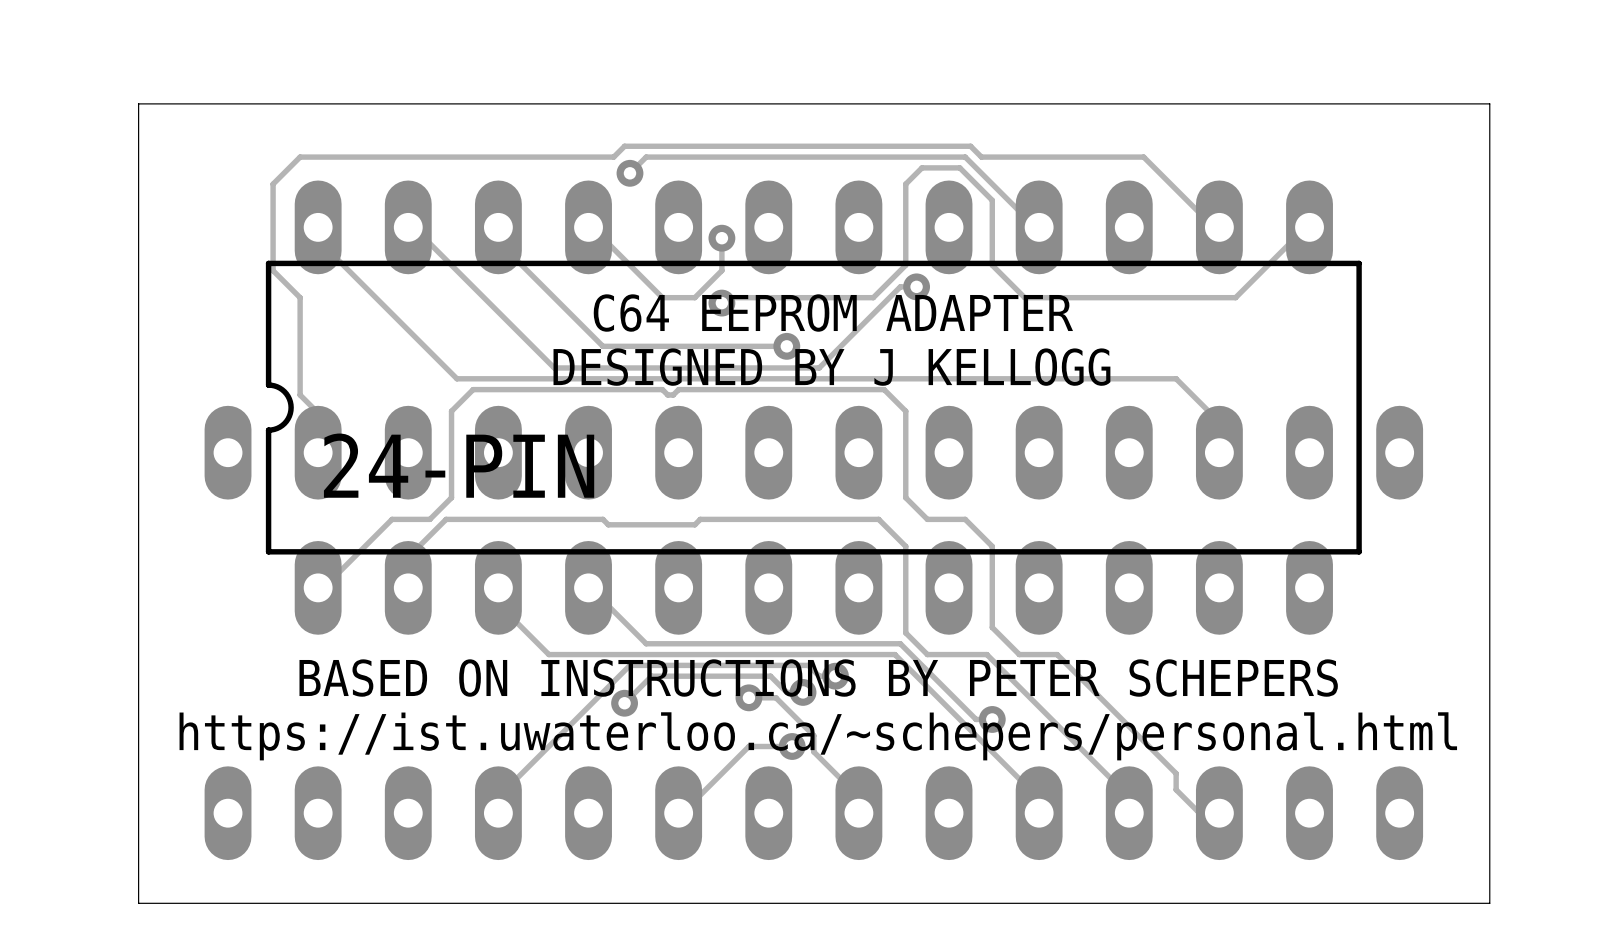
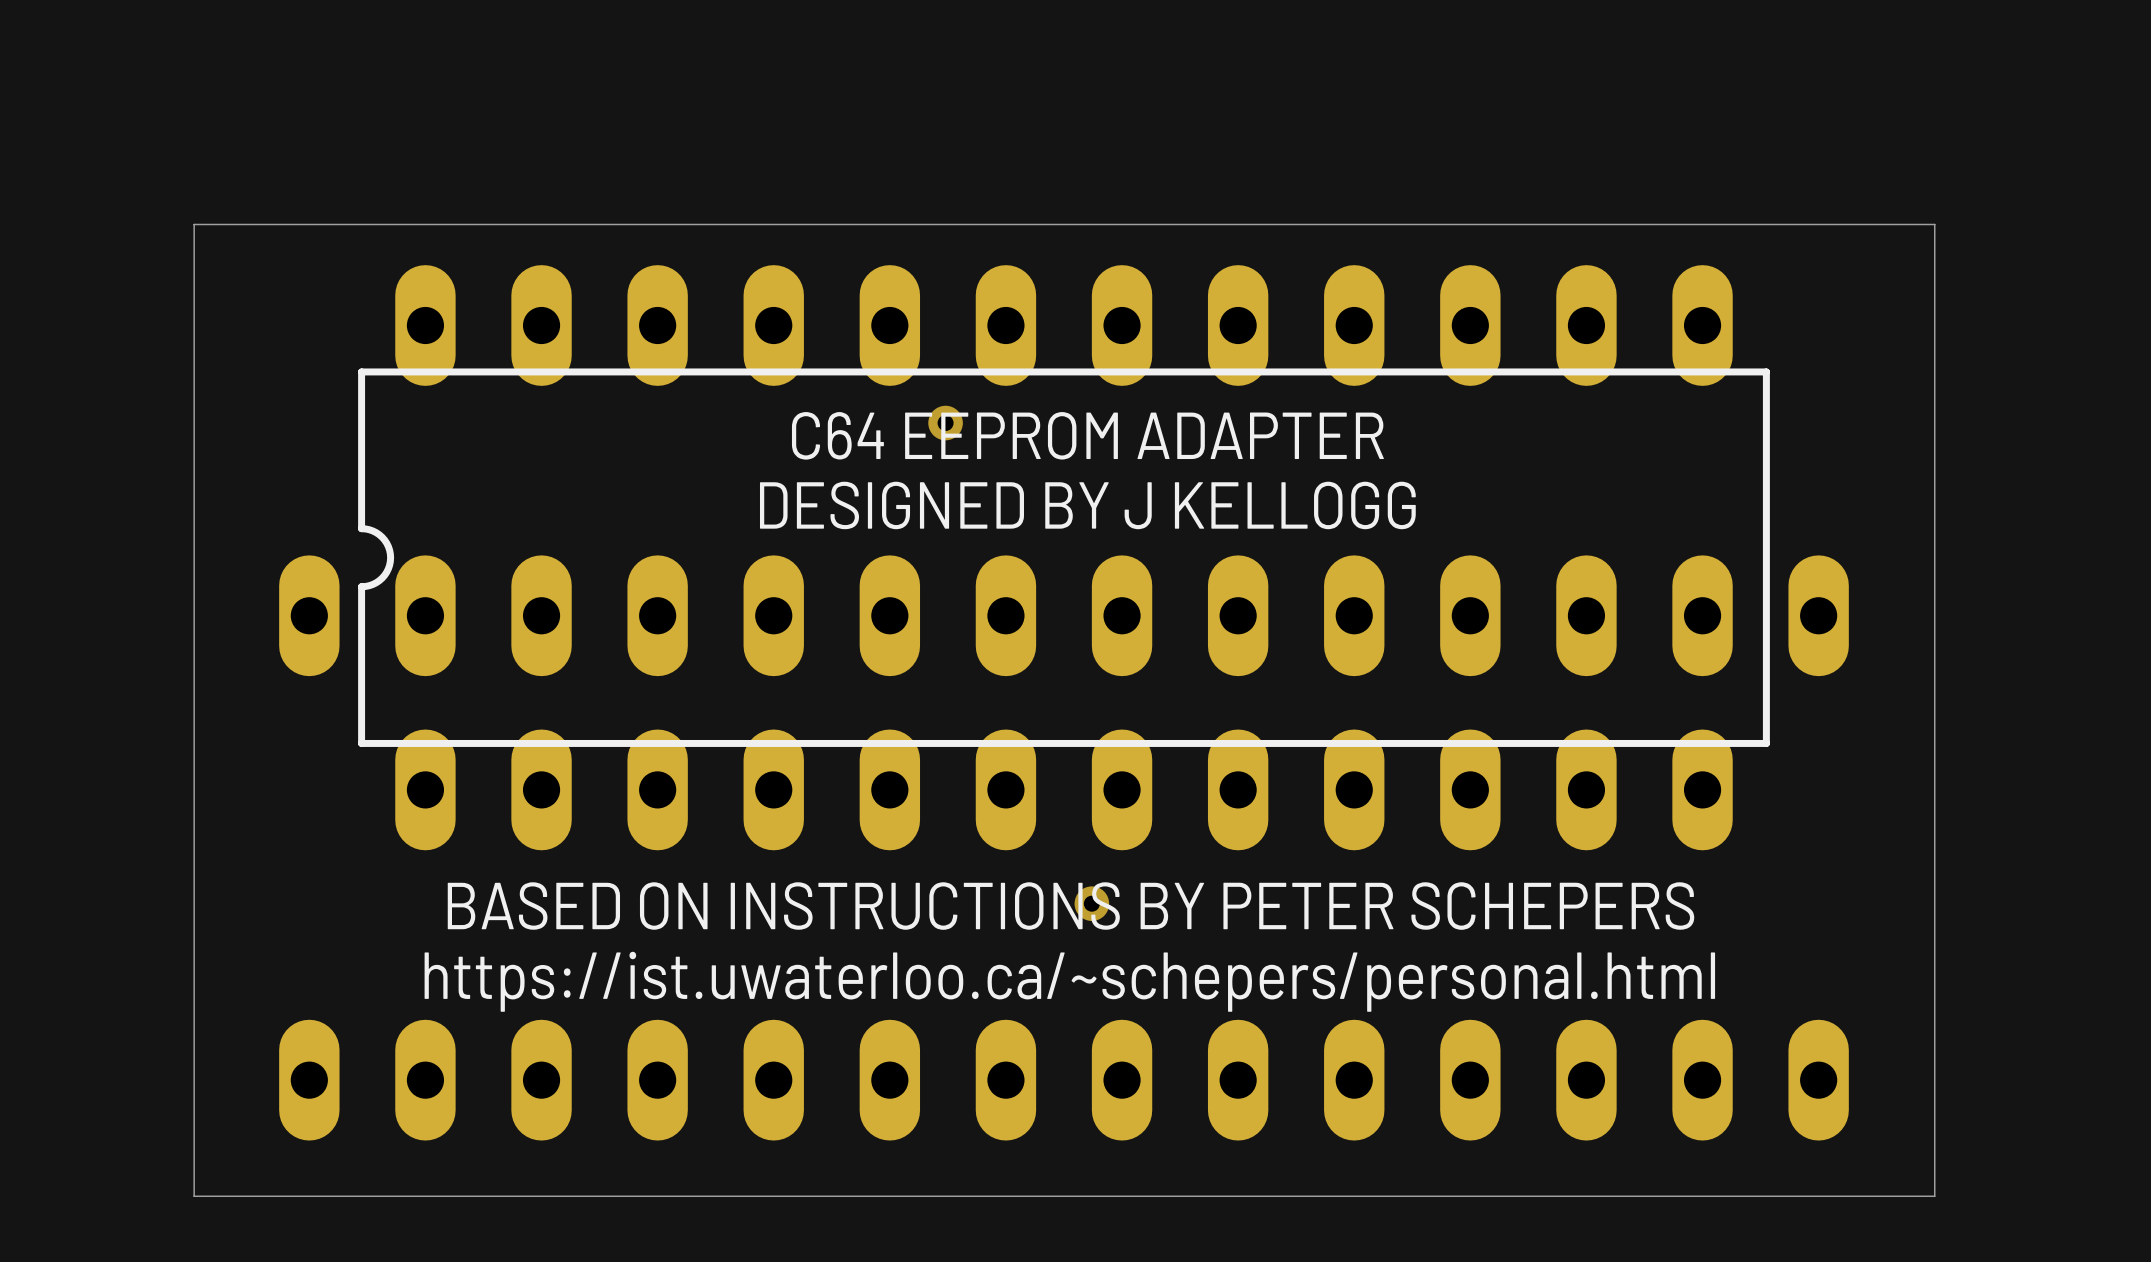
board edge: (1489, 148) (1489, 103) (138, 103) (138, 148) -> (1934, 224) (194, 224)
track: (629, 173) (646, 157) (965, 157) (1035, 227) (1039, 227) -> none
via: (629, 173) -> none
track: (318, 227) (321, 227) (321, 243) (456, 378) (1176, 378) (1219, 422) (1219, 452) -> none
track: (408, 227) (413, 227) (554, 367) (819, 367) (900, 286) (916, 286) -> none
track: (498, 227) (500, 227) (500, 243) (602, 346) (786, 346) -> none
track: (588, 227) (592, 227) (662, 297) (694, 297) (721, 270) (721, 238) -> none
track: (1219, 227) (1213, 227) (1143, 157) (981, 157) (970, 146) (624, 146) (613, 157) (300, 157) (273, 184) (273, 270) (300, 297) (300, 395) (316, 411) (316, 449) (318, 452) -> none
track: (1309, 227) (1305, 227) (1235, 297) (1024, 297) (992, 265) (992, 200) (959, 167) (921, 167) (905, 184) (905, 265) (873, 297) (727, 297) (721, 303) -> none
via: (721, 238) -> none
via: (916, 286) -> none
via: (786, 346) -> none
text: 24-PIN (459, 465) -> none
track: (318, 587) (321, 589) (392, 519) (429, 519) (451, 497) (451, 411) (473, 389) (662, 389) (667, 395) (673, 395) (678, 389) (884, 389) (905, 411) (905, 497) (927, 519) (965, 519) (992, 546) (992, 627) (1019, 654) (1057, 654) (1176, 773) (1176, 789) (1197, 811) (1219, 811) (1219, 813) -> none
track: (408, 587) (408, 557) (446, 519) (602, 519) (608, 524) (694, 524) (700, 519) (878, 519) (905, 546) (905, 632) (927, 654) (986, 654) (1127, 795) (1127, 811) (1129, 813) -> none
track: (498, 587) (500, 589) (500, 605) (548, 654) (894, 654) (1035, 795) (1035, 811) (1039, 813) -> none
track: (588, 587) (646, 643) (900, 643) (976, 719) (992, 719) -> none
track: (835, 676) (819, 676) (808, 665) (629, 665) (500, 795) (500, 811) (498, 813) -> none
track: (803, 692) (786, 692) (770, 676) (651, 676) (624, 703) -> none
via: (803, 692) -> none
track: (748, 697) (775, 697) (813, 735) (813, 751) (857, 795) (857, 811) (858, 813) -> none
via: (748, 697) -> none
via: (624, 703) -> none
via: (992, 719) -> none
track: (792, 746) (748, 746) (678, 816) (678, 813) -> none
via: (792, 746) -> none

